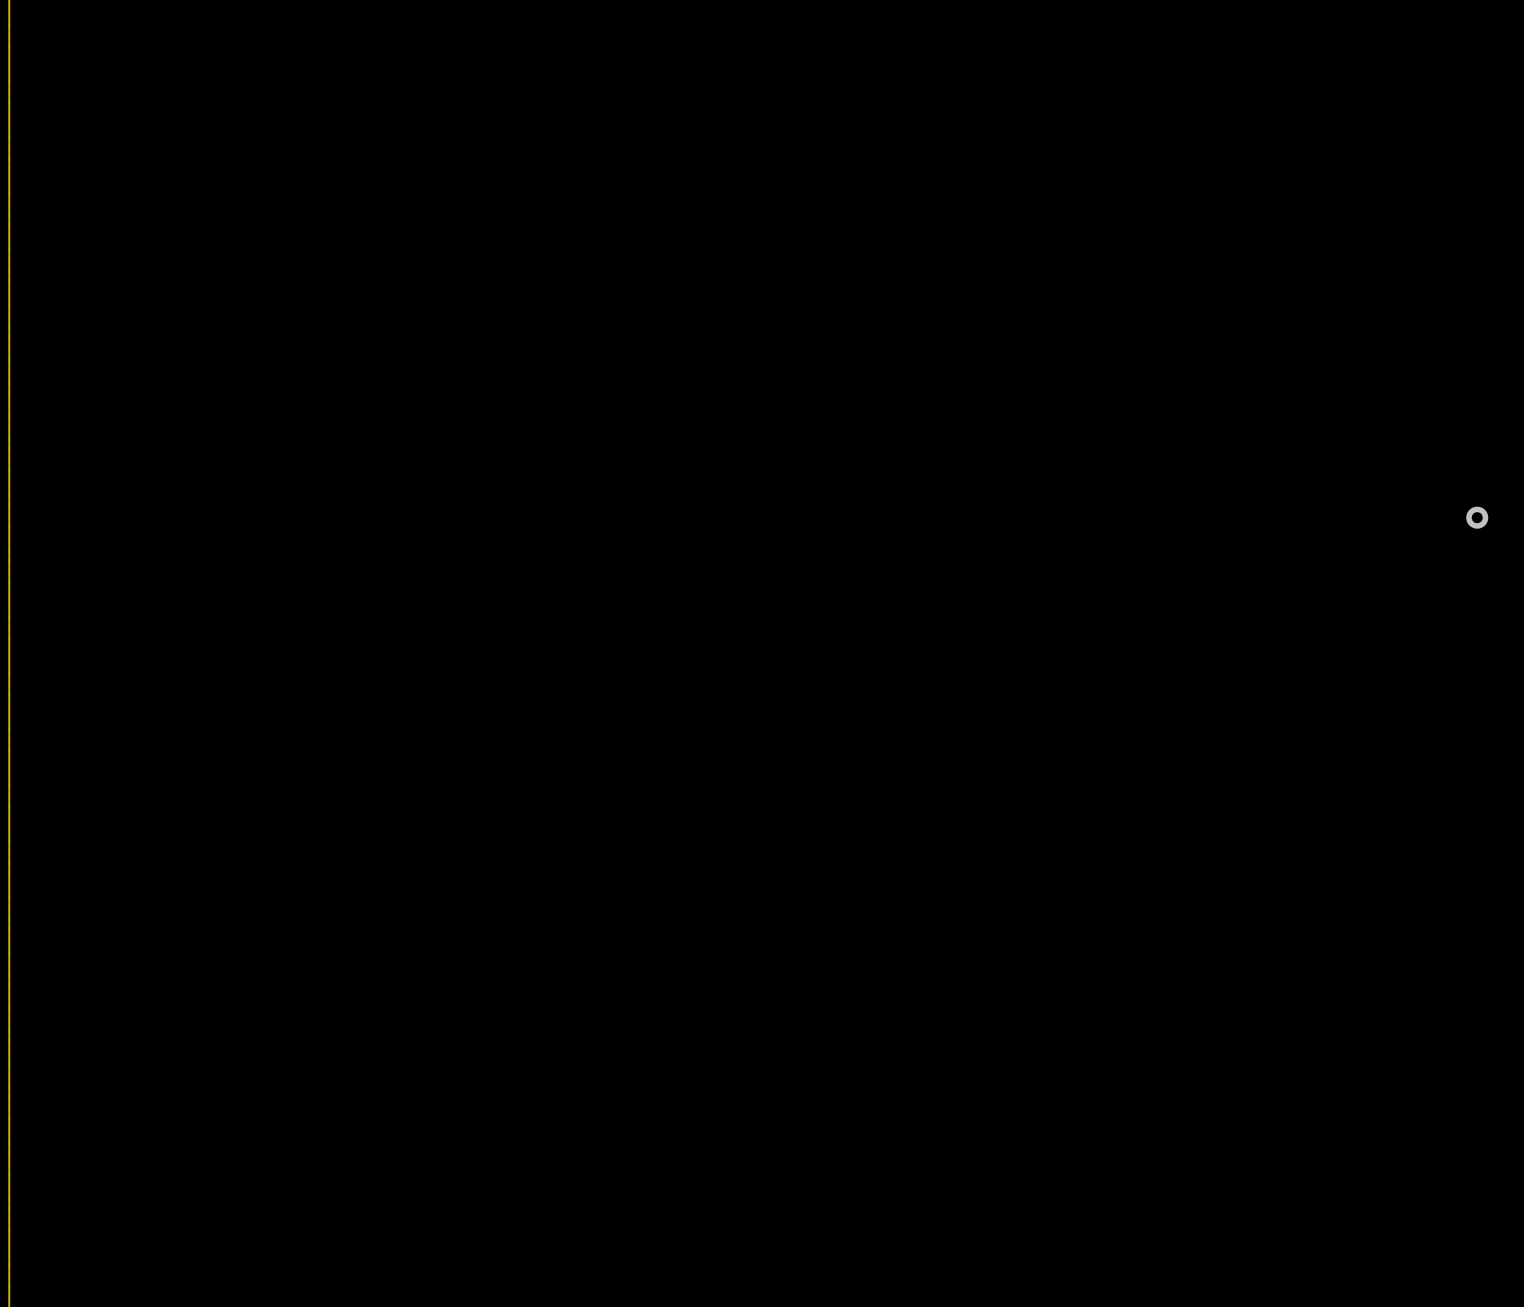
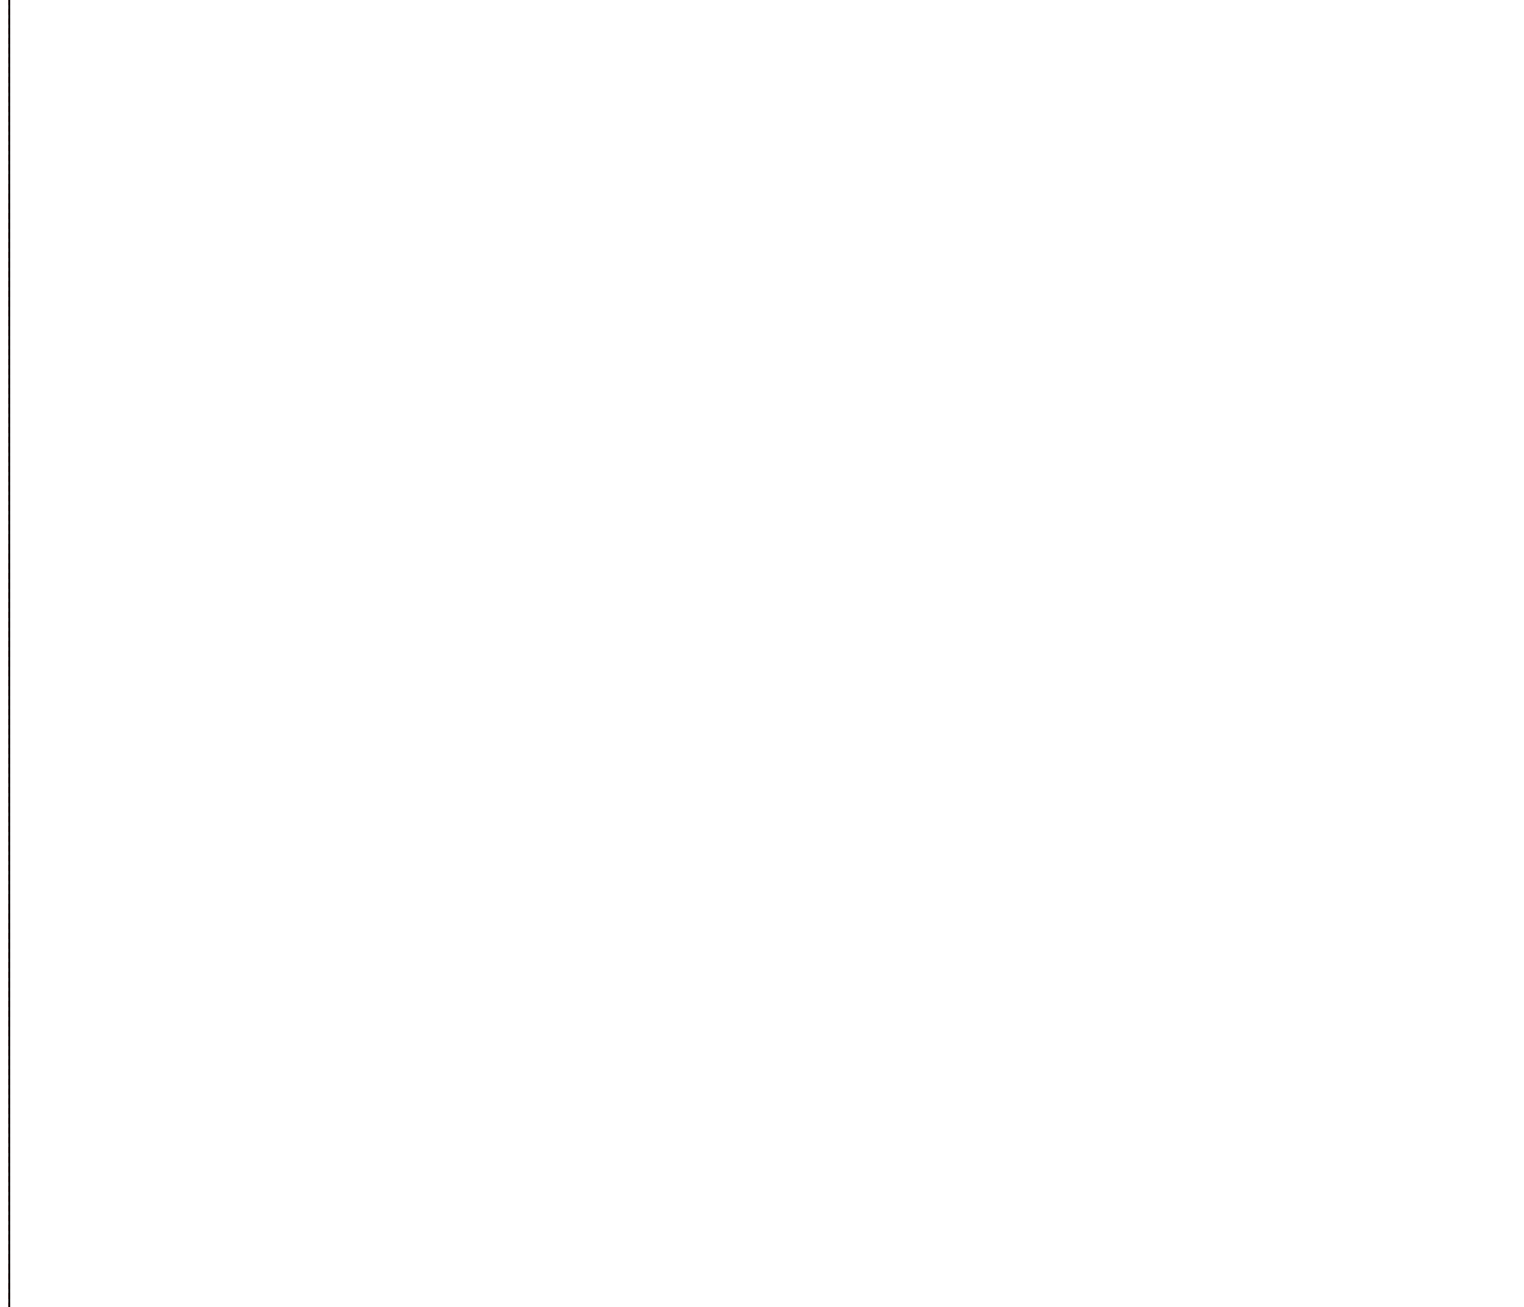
via: (1477, 517) -> none

